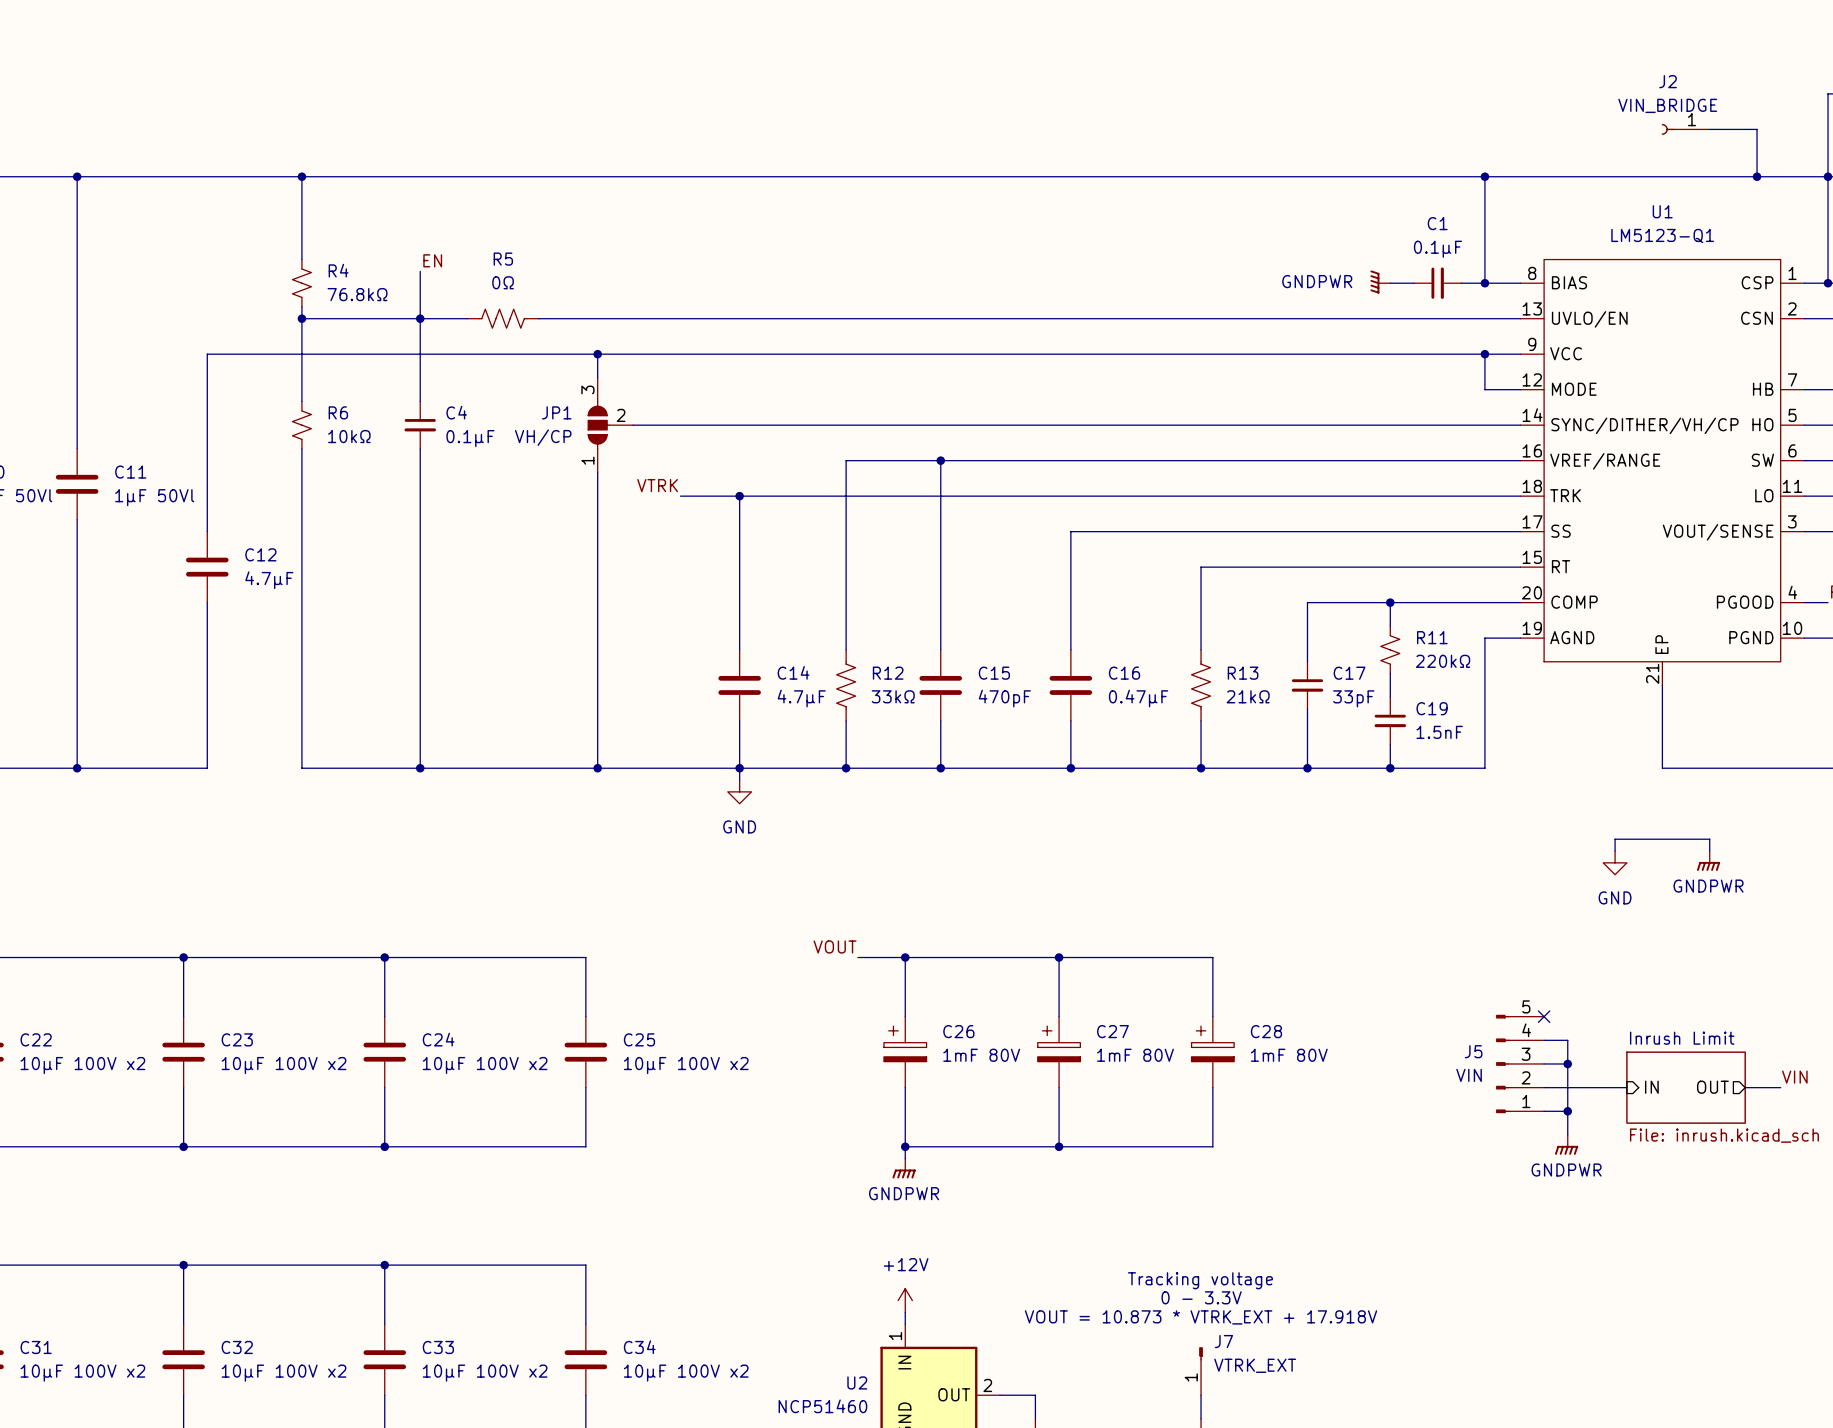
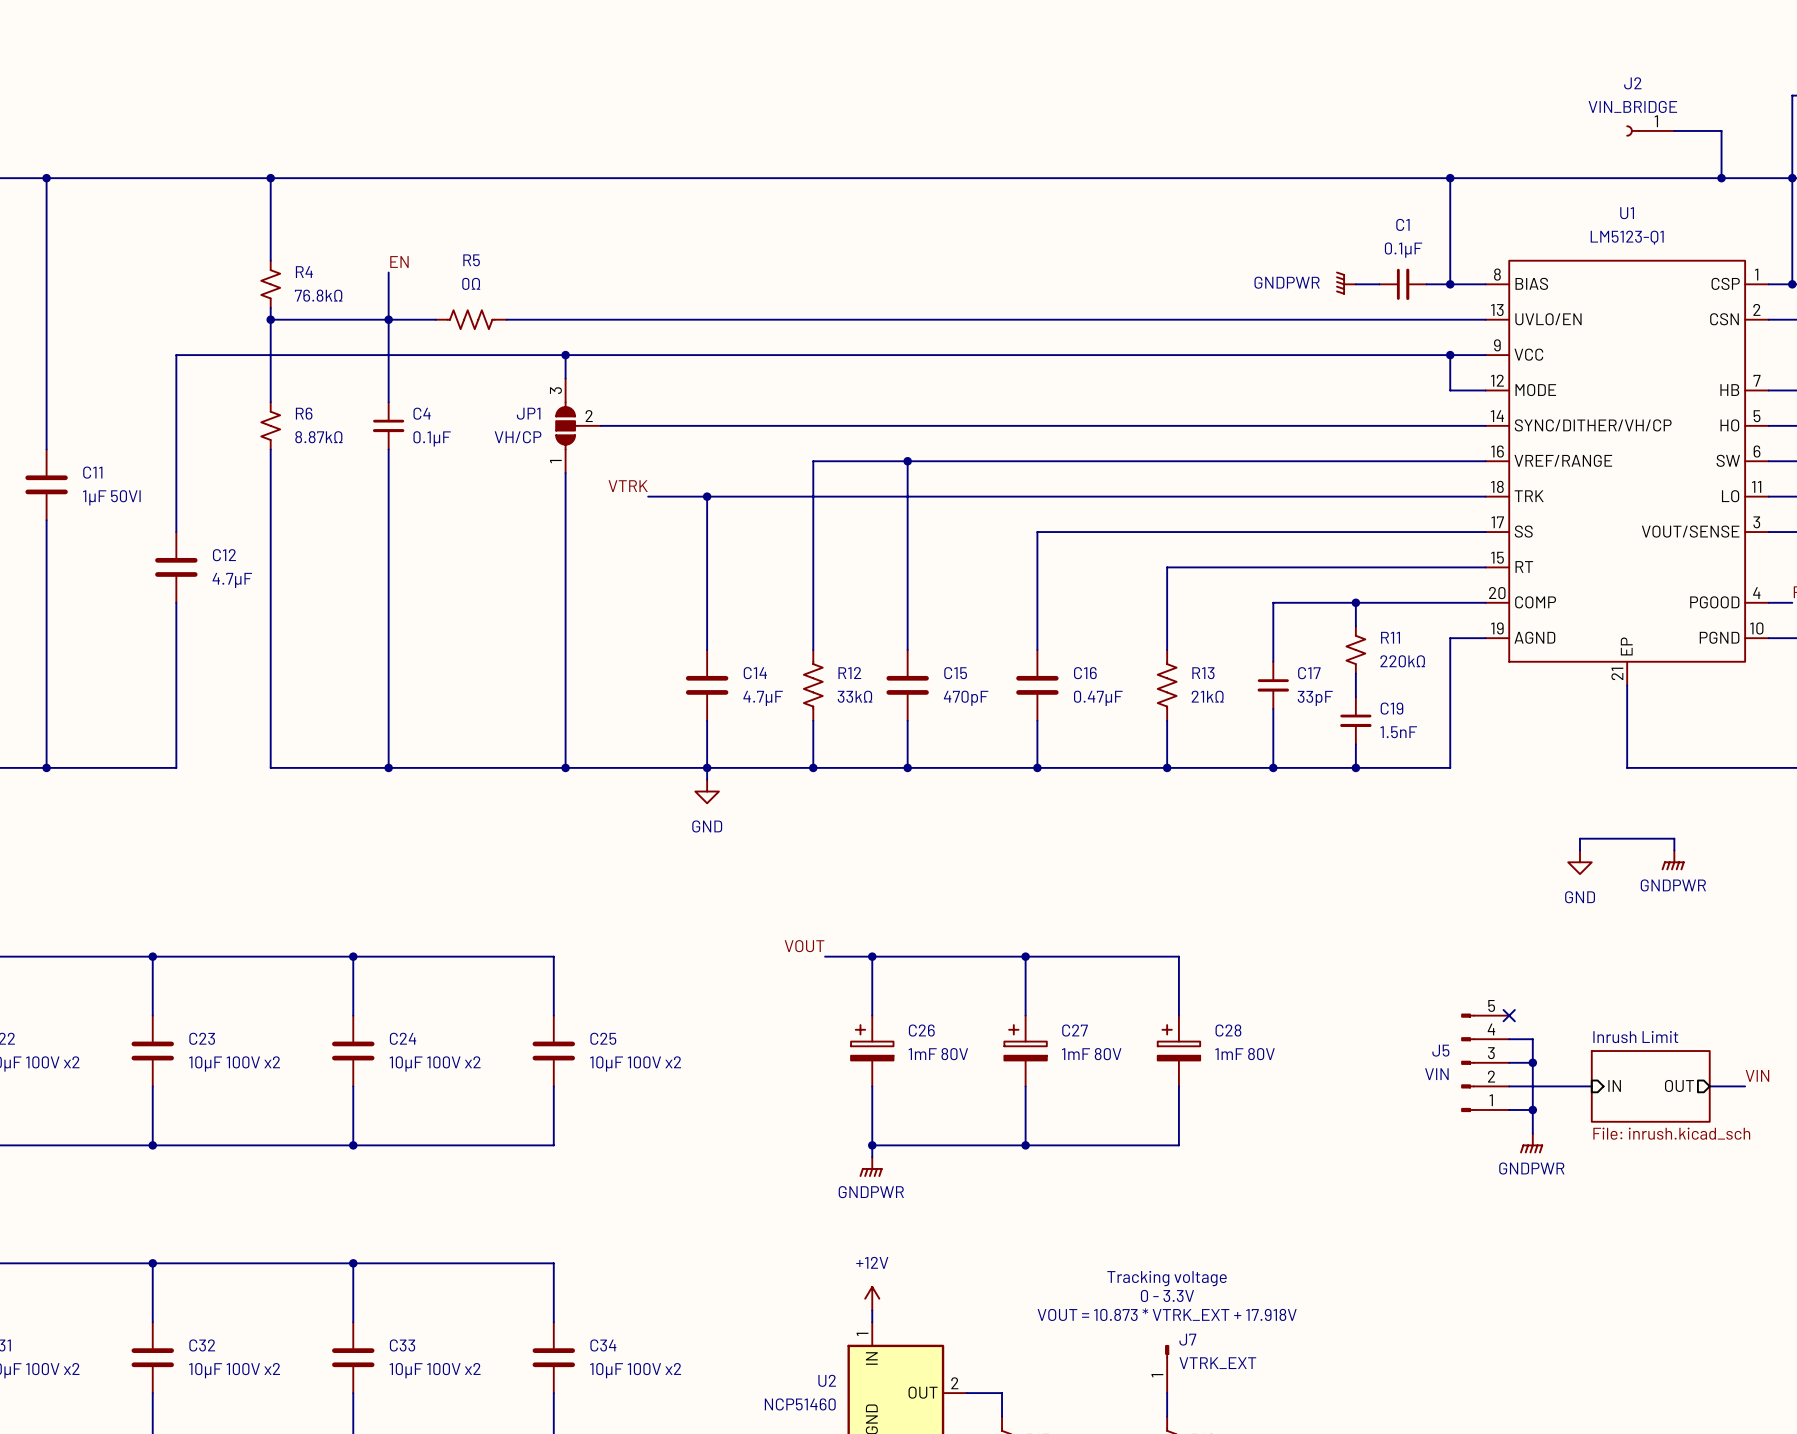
R6 value: 10kΩ (349, 436) -> 8.87kΩ (318, 437)

